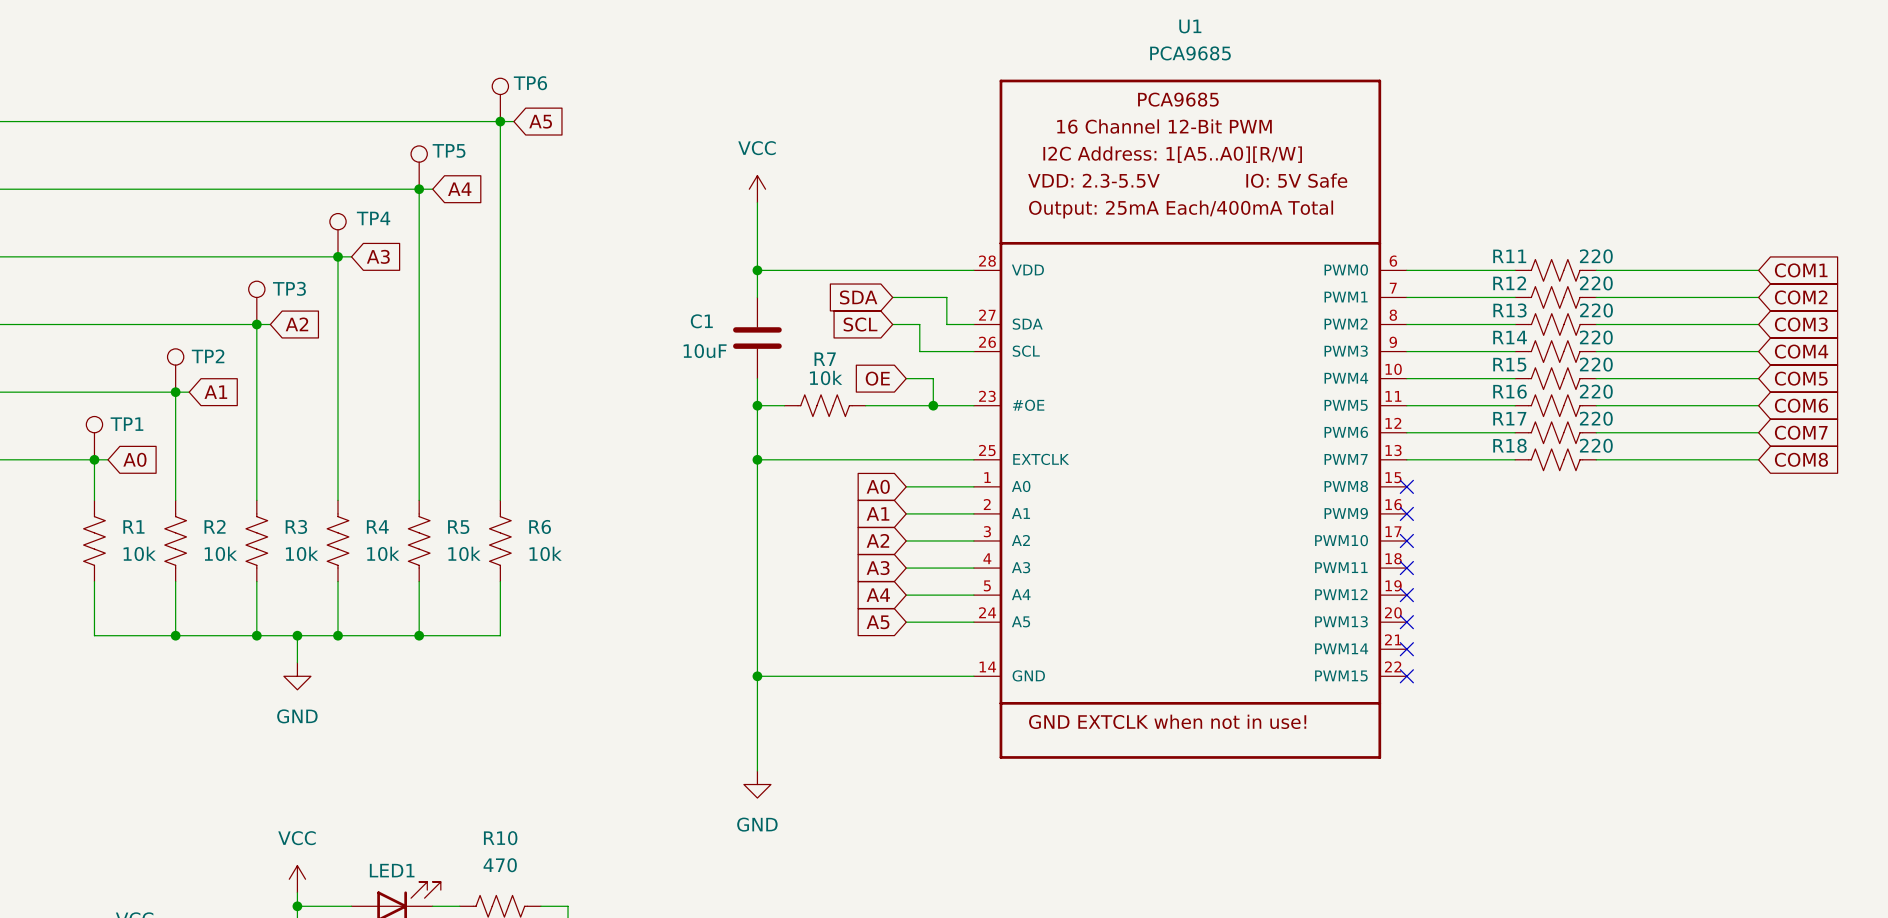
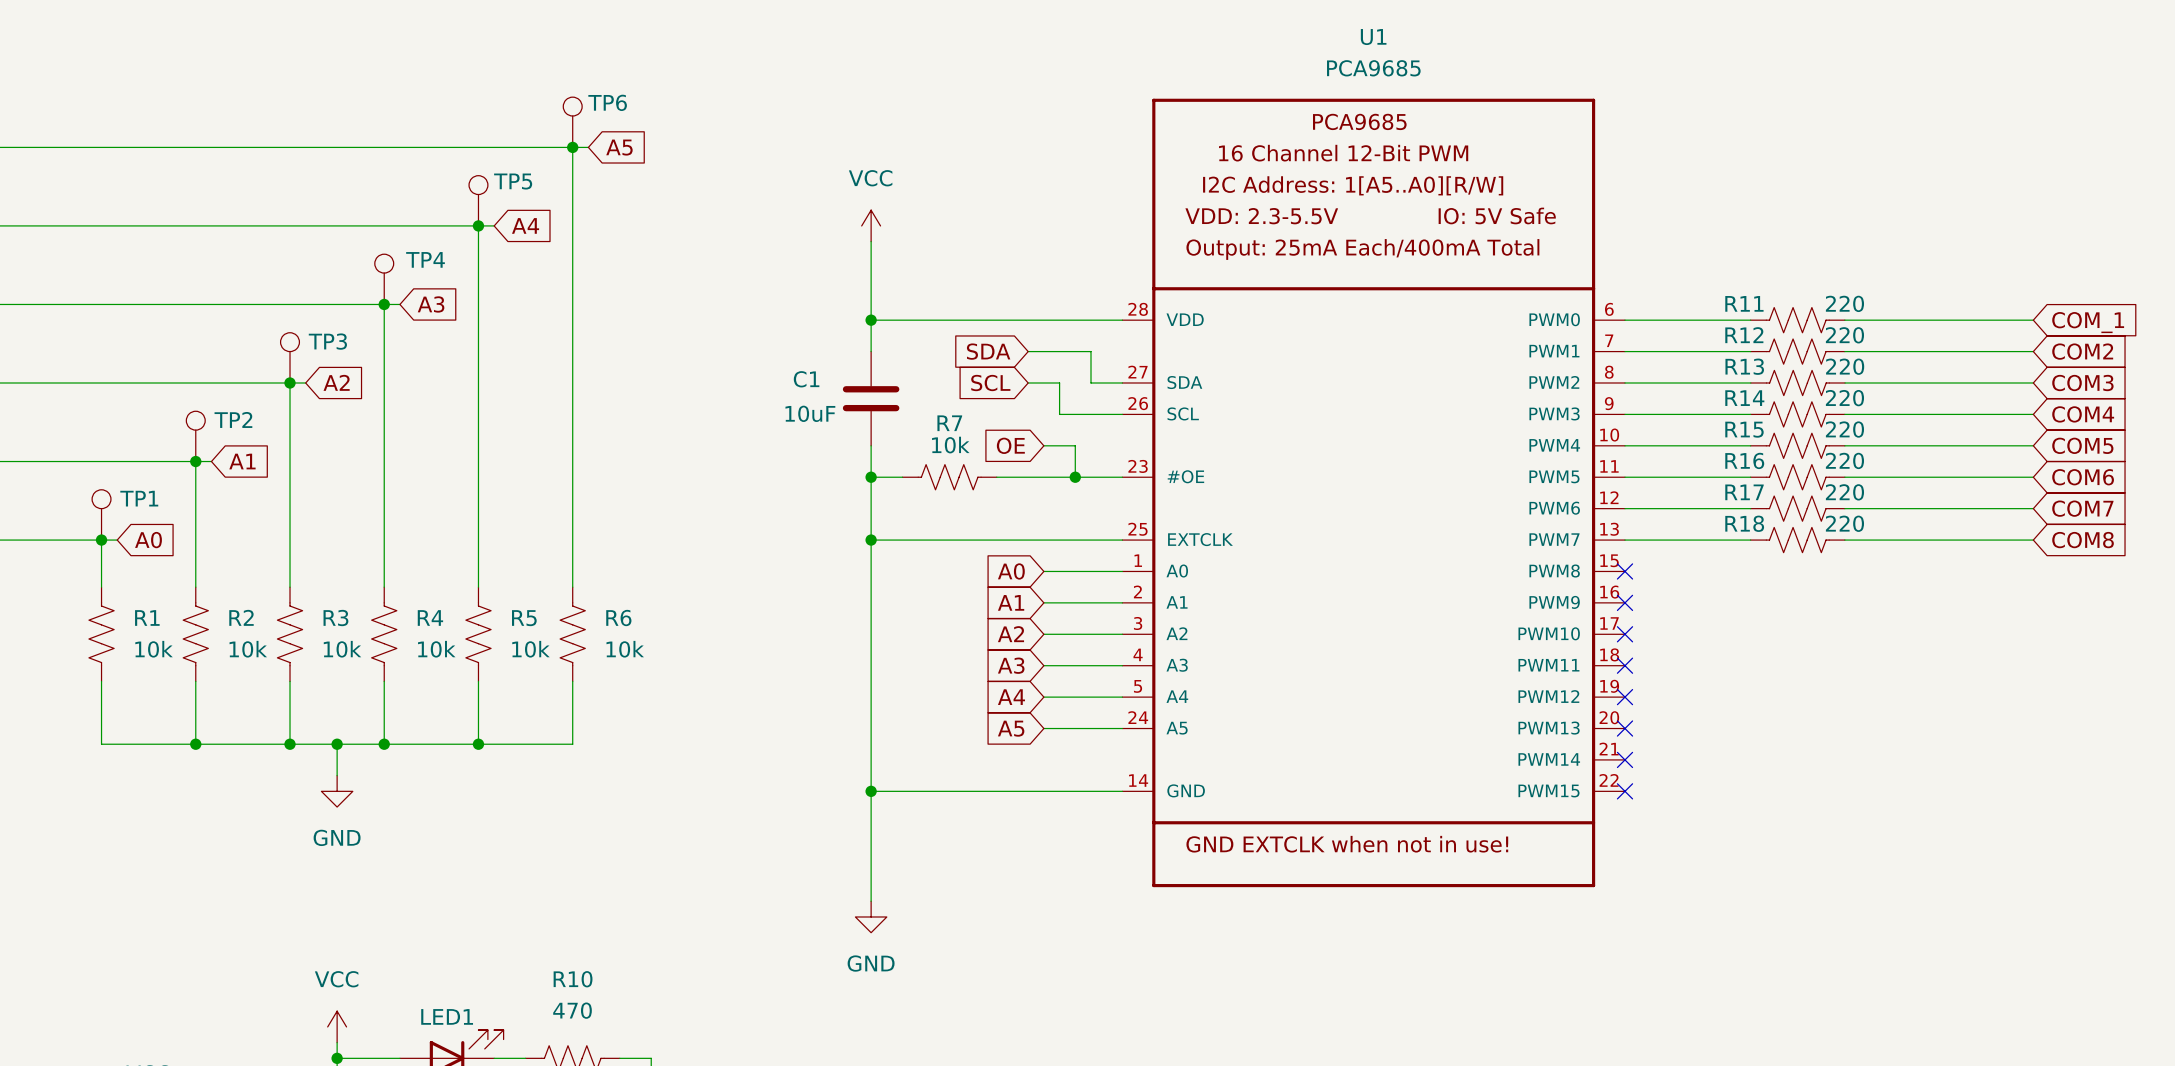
global label: COM1 (1801, 270) -> COM_1 (2088, 322)

